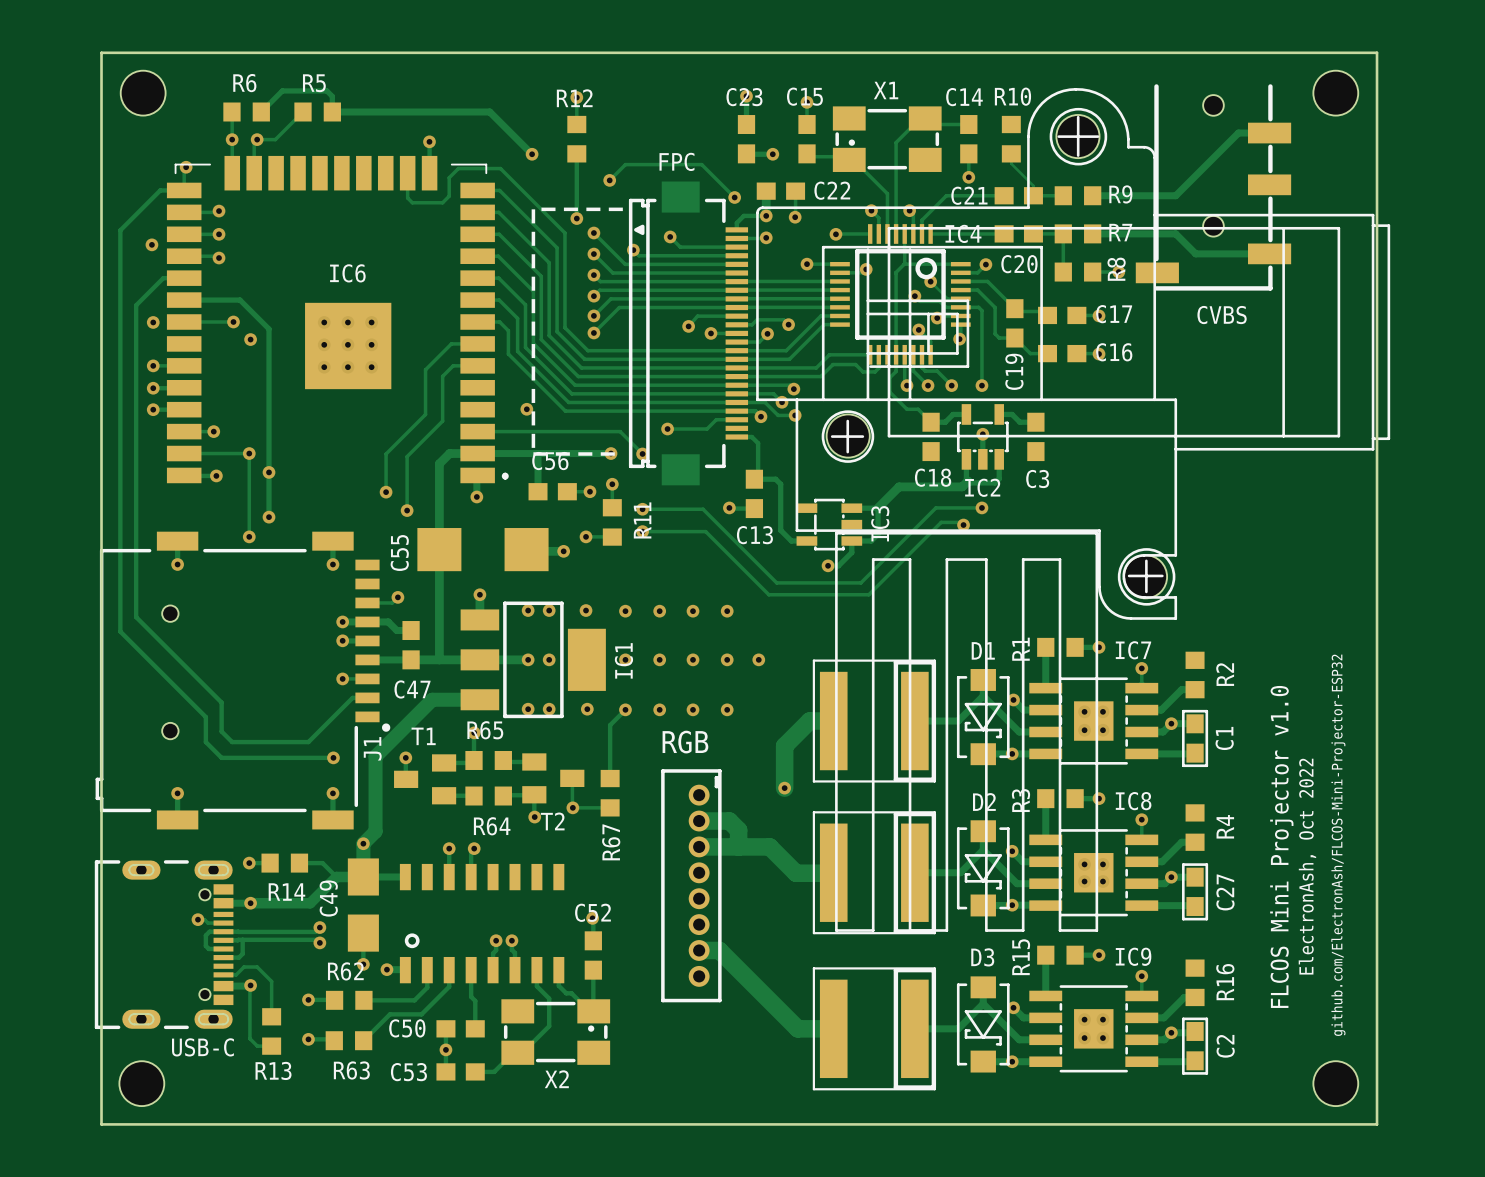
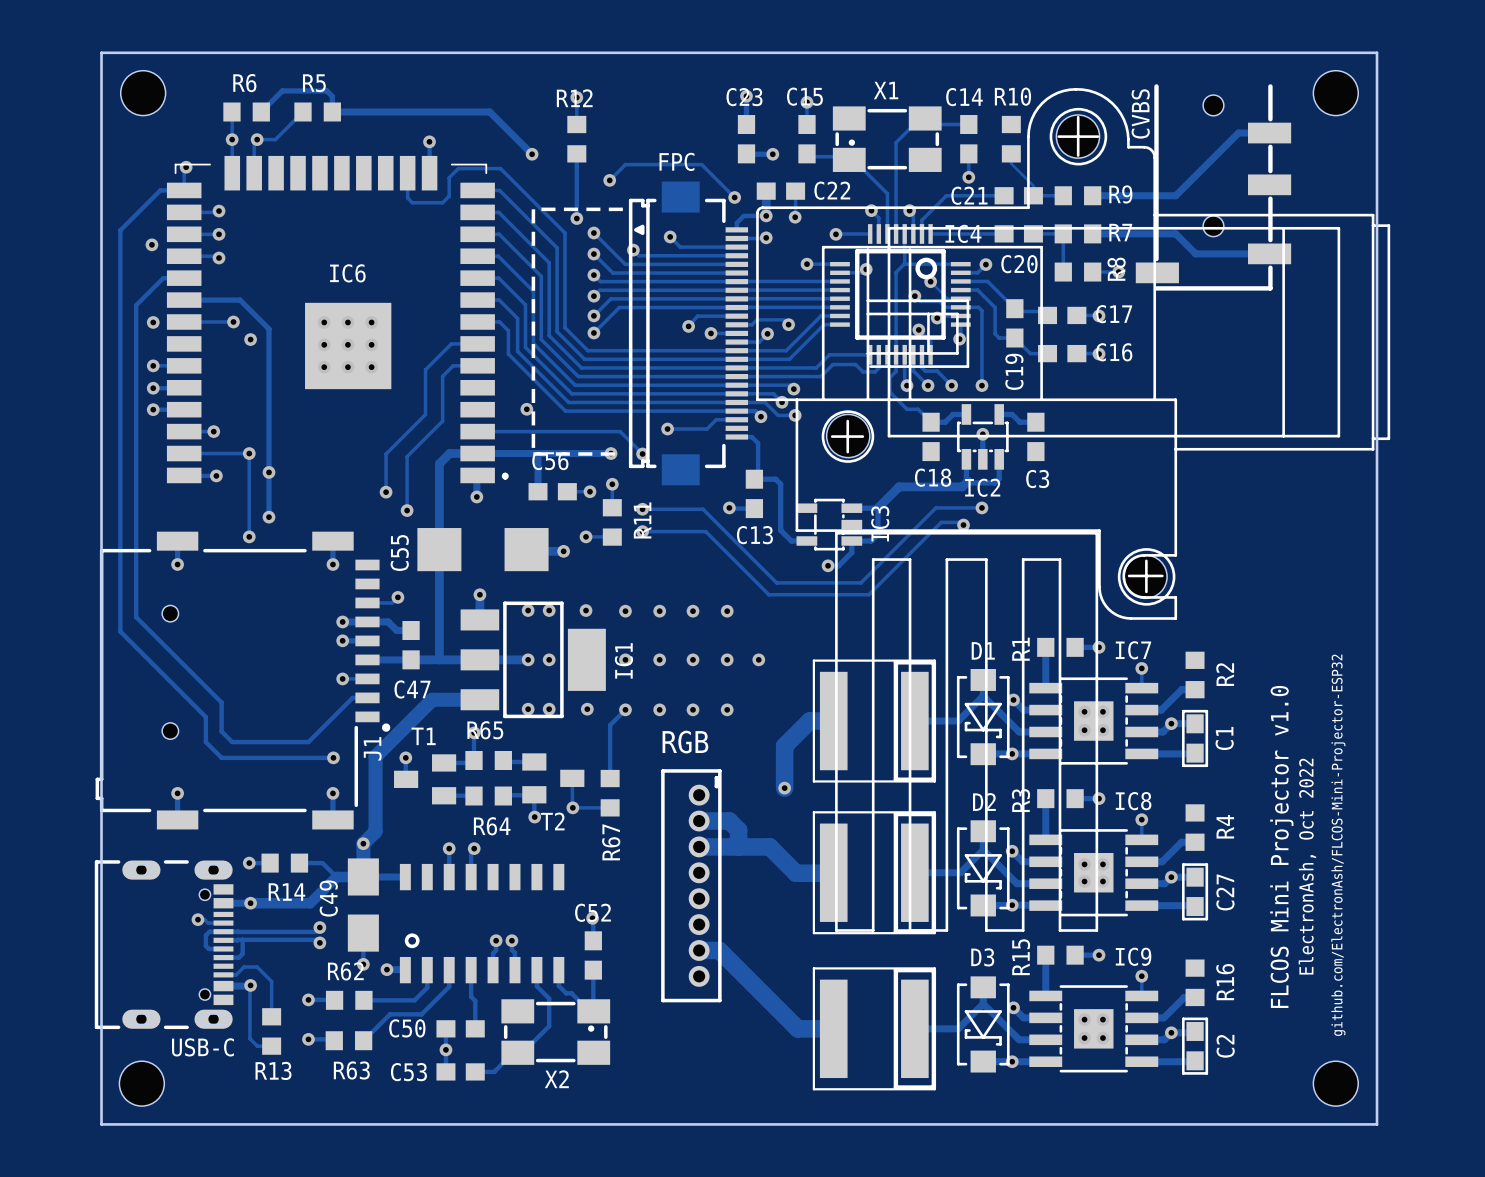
CVBS name rotation: 0° (1222, 315) -> 90° counterclockwise (1140, 113)
CVBS name position: CVBS (1222, 315) -> CVBS (1140, 113)

